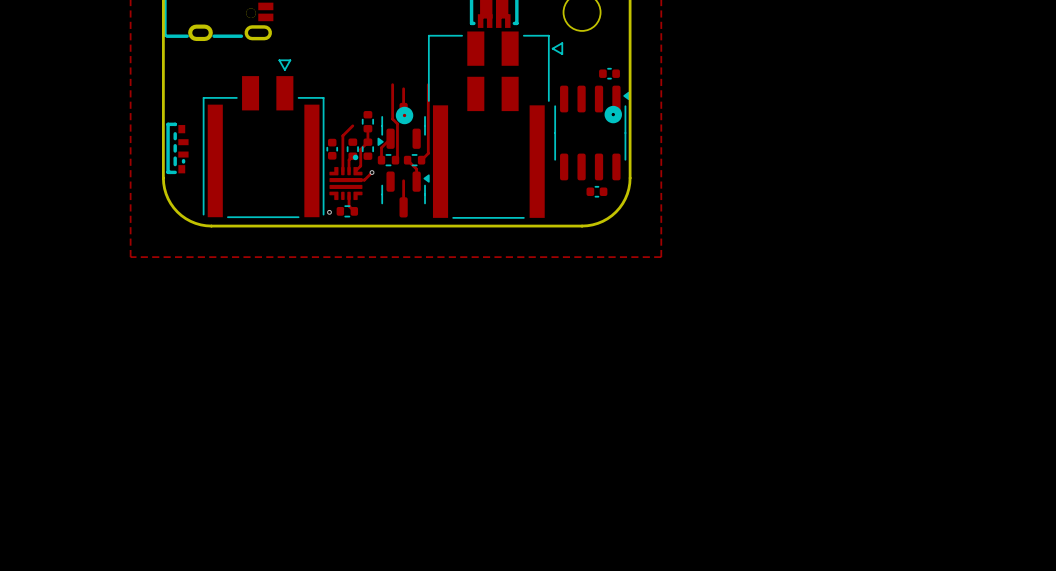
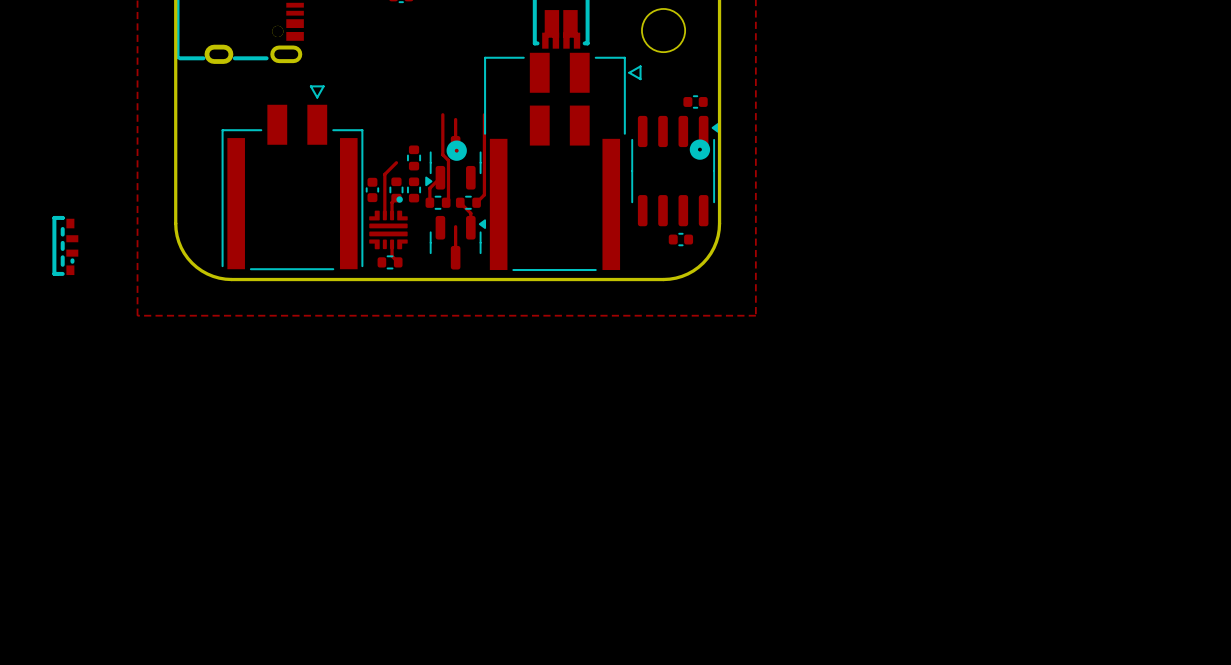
track: (367, 128) (367, 142) (360, 149) (360, 165) (355, 171) -> none
part position: (177, 148) -> (65, 245)
track: (372, 172) (364, 180) (345, 180) -> none
via: (372, 172) -> none
via: (329, 212) -> none

